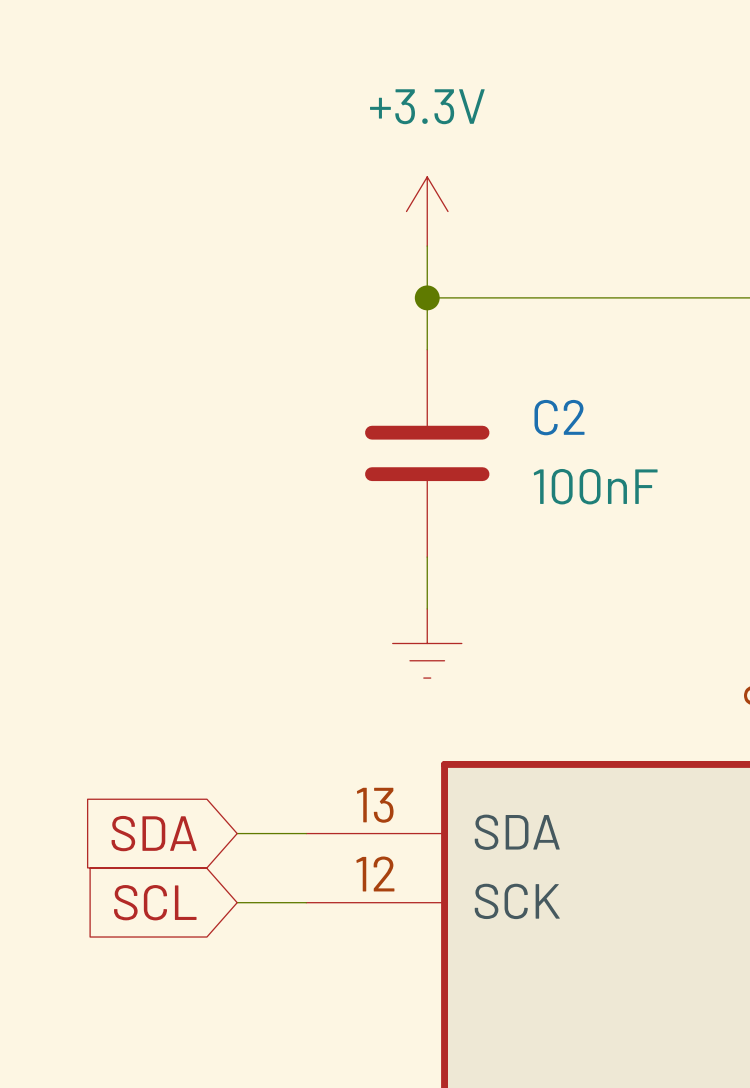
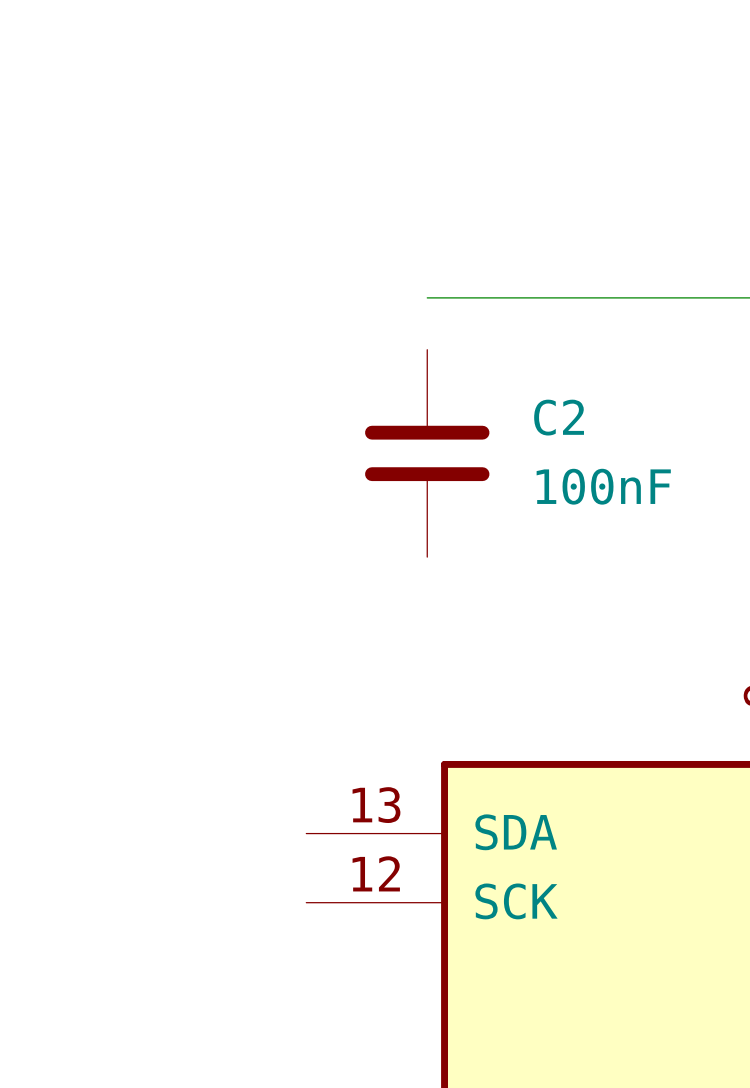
power symbol: +3.3V (427, 211) -> none
wire: (427, 246) (427, 349) -> none
junction: (427, 297) -> none
wire: (427, 557) (427, 608) -> none
power symbol: (427, 643) -> none
global label: SDA (154, 833) -> none
wire: (237, 833) (306, 833) -> none
global label: SCL (155, 902) -> none
wire: (237, 902) (306, 902) -> none

